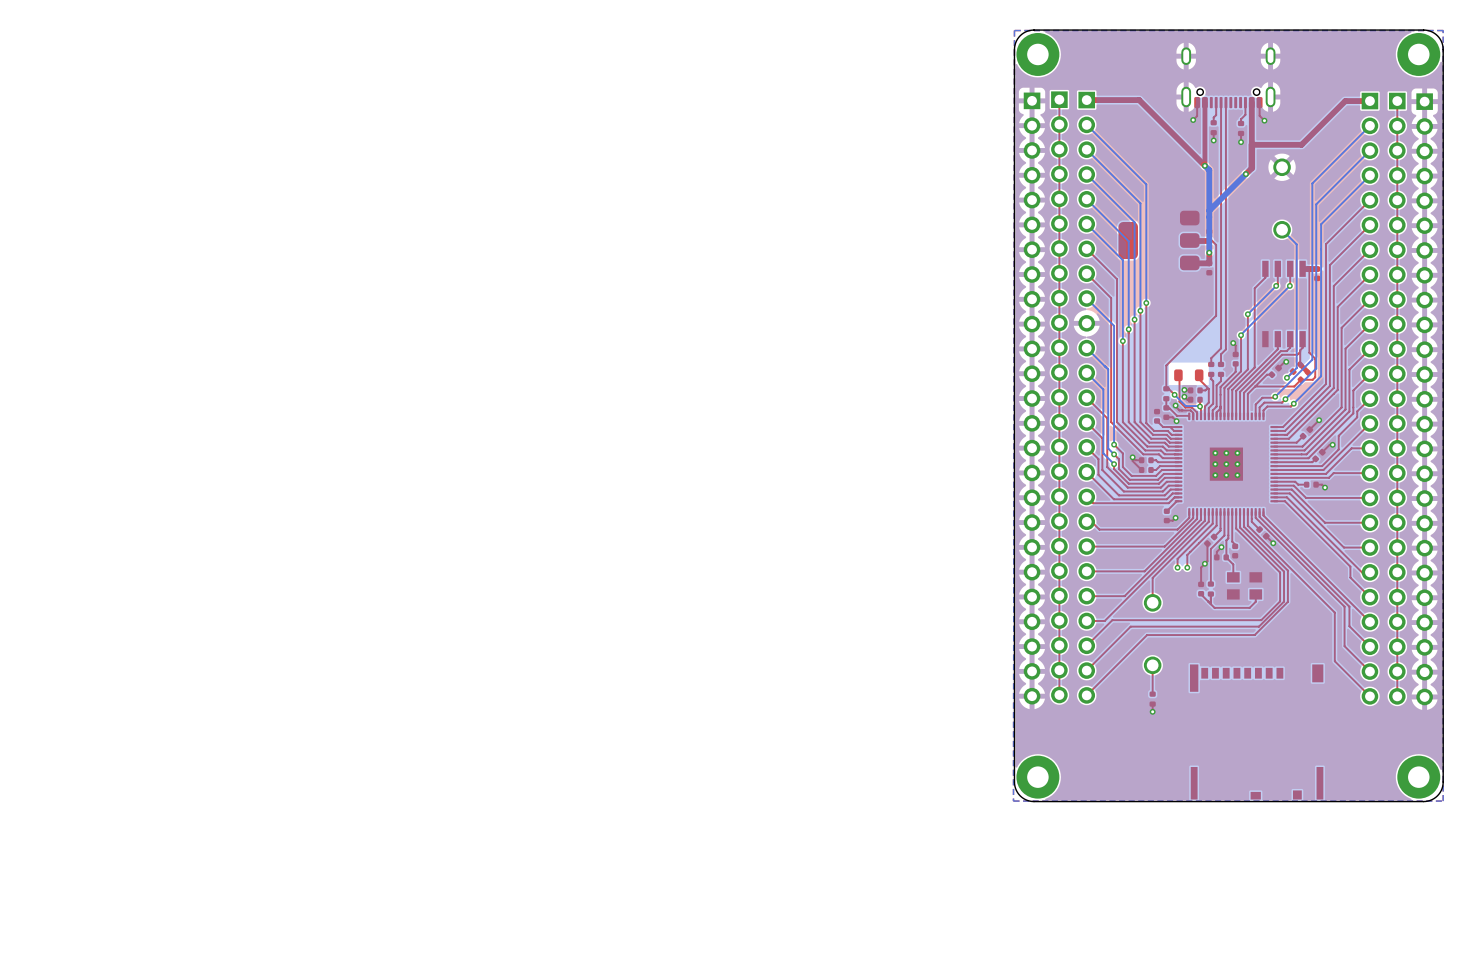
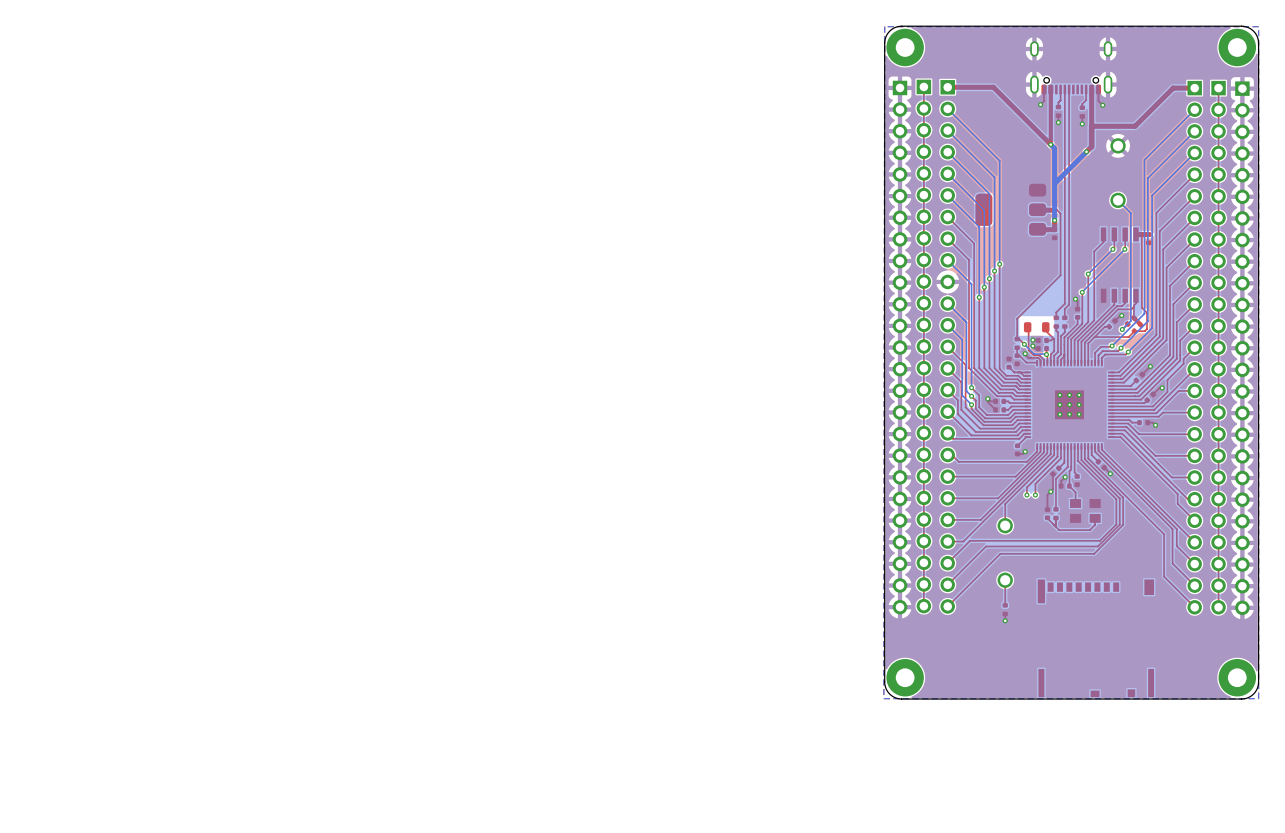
top track: (1166, 417) (1172, 417) (1176, 421) -> none
via: (1176, 421) -> none

